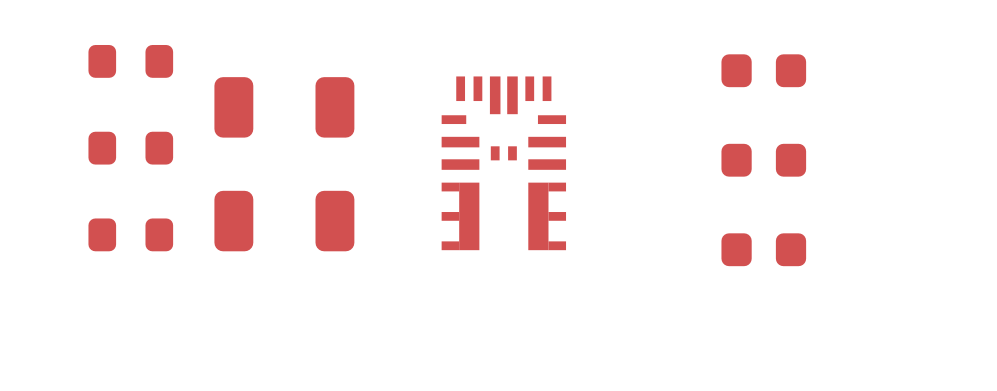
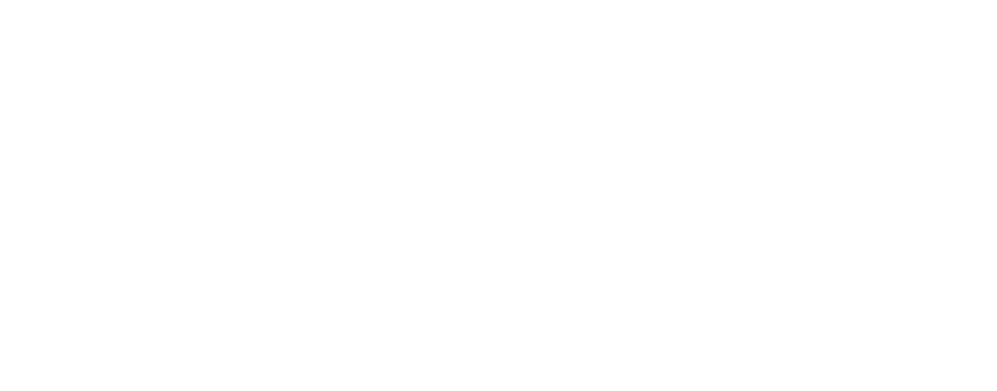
part: (130, 61) -> none
part: (763, 70) -> none
part: (284, 107) -> none
part: (130, 148) -> none
part: (763, 160) -> none
part: (503, 163) -> none
part: (284, 221) -> none
part: (130, 234) -> none
part: (763, 249) -> none

